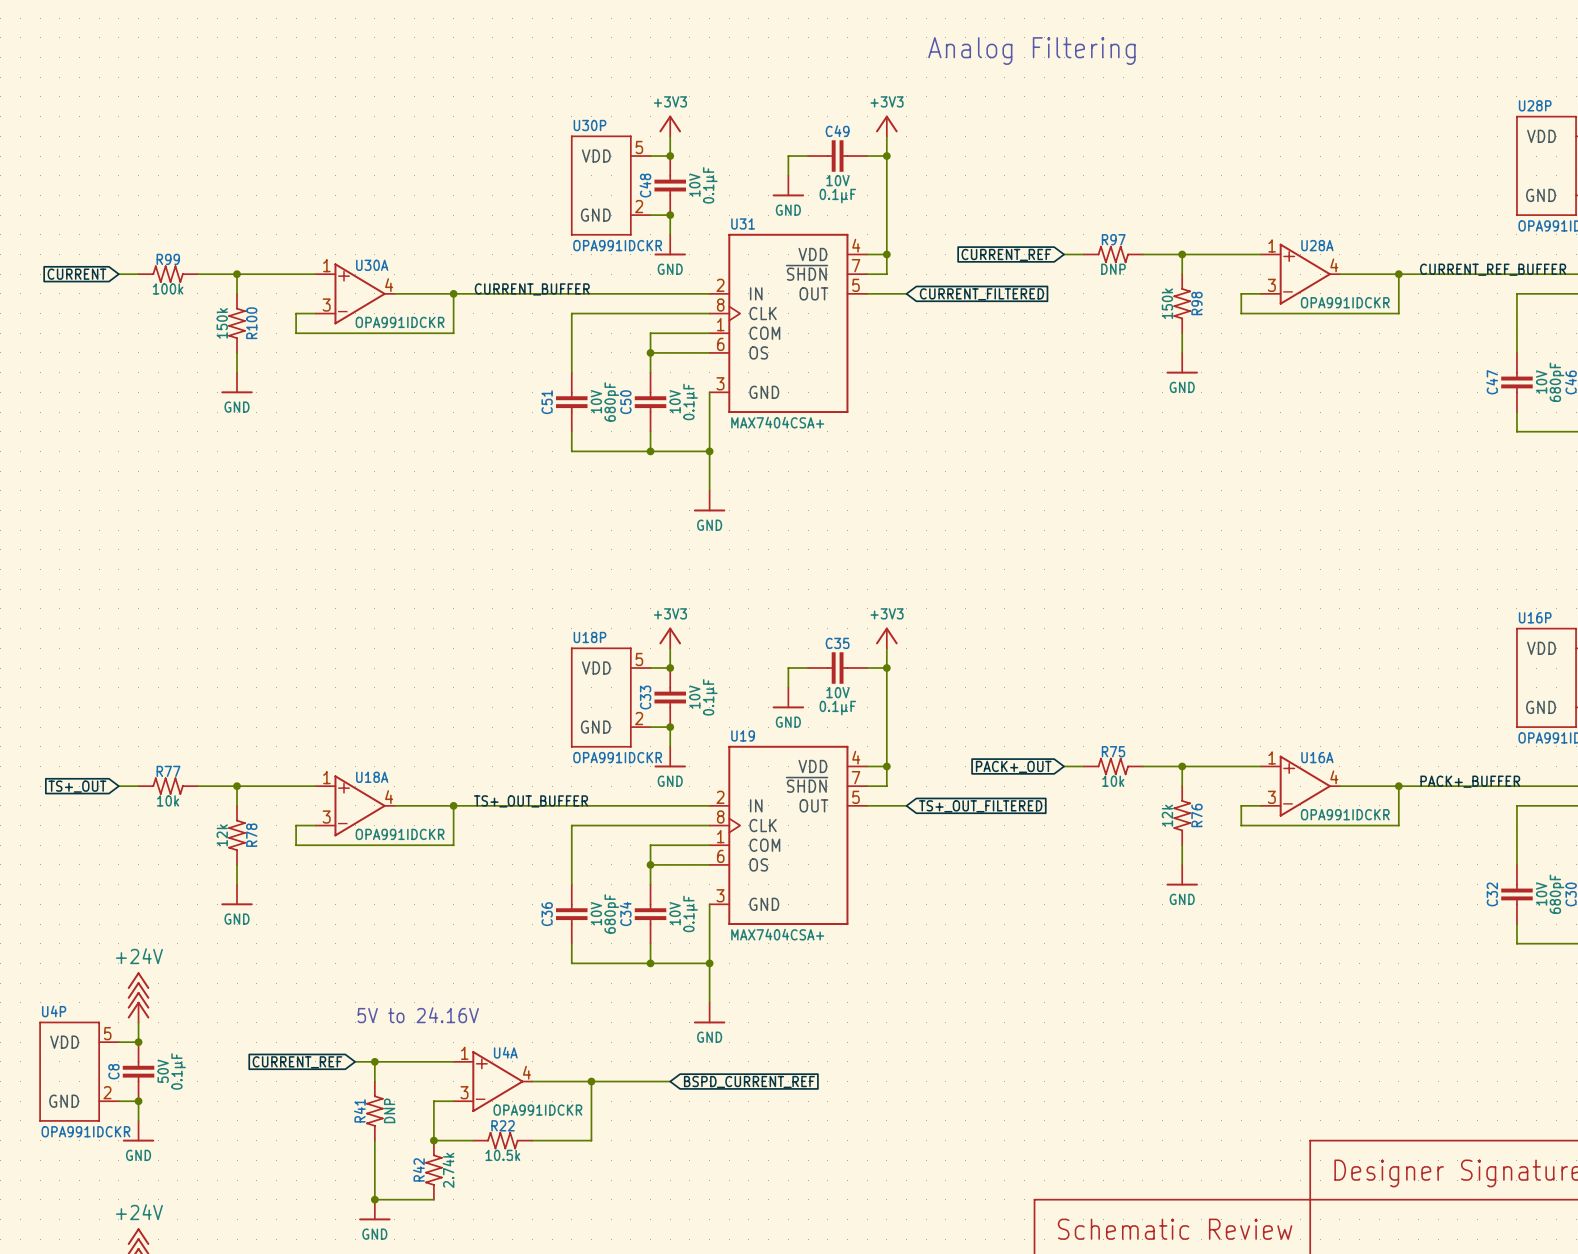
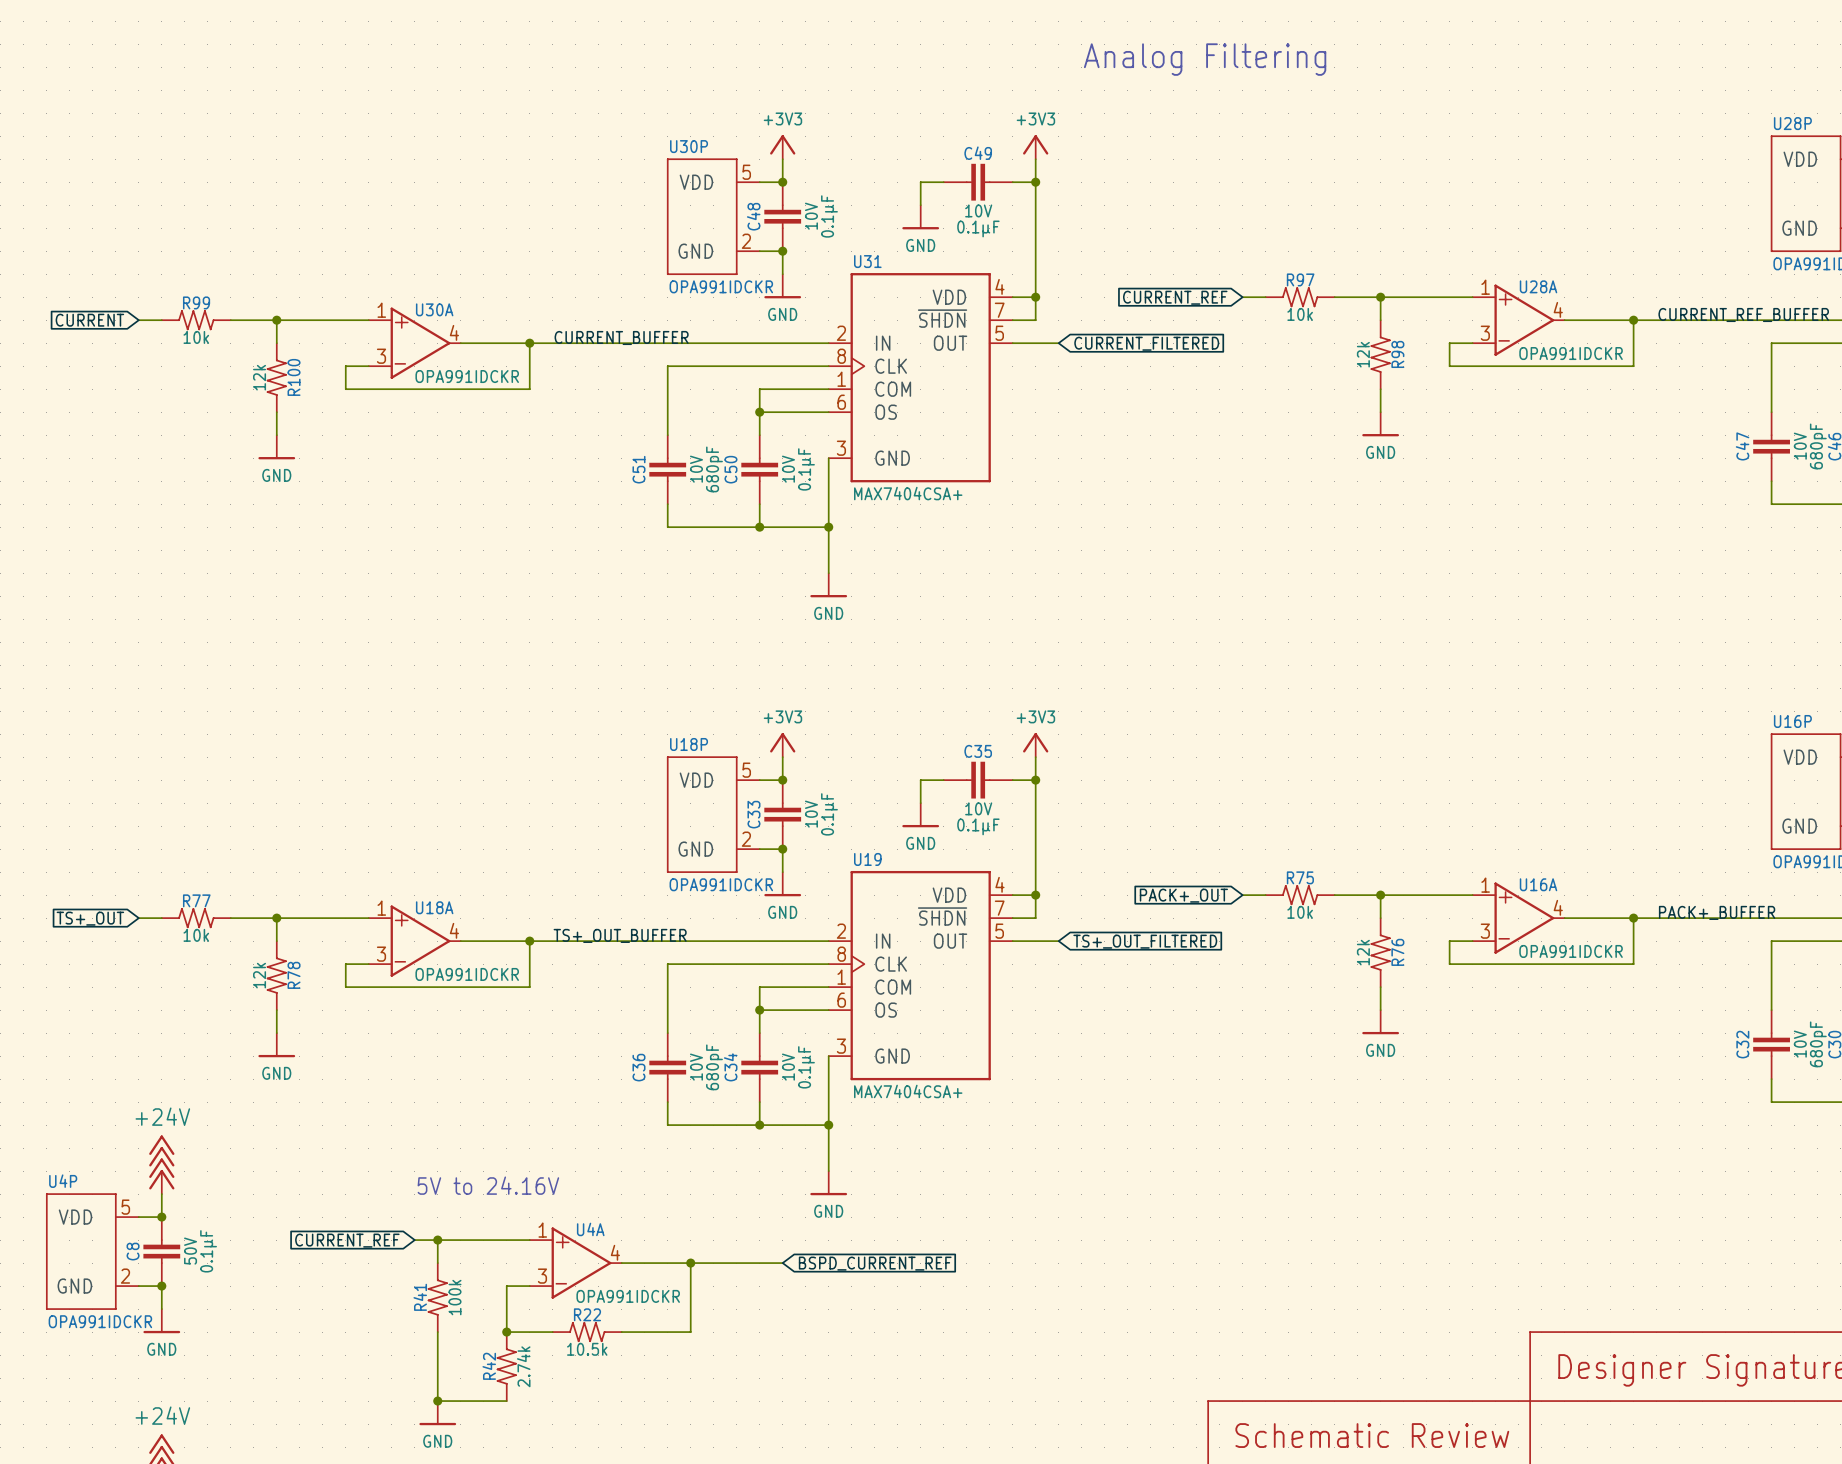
R97 text: DNP (1113, 269) -> 10k (1300, 314)
R99 text: 100k (168, 288) -> 10k (196, 337)
R98 text: 150k (1167, 303) -> 12k (1363, 354)
R100 text: 150k (222, 323) -> 12k (259, 377)
R41 text: DNP (389, 1110) -> 100k (455, 1297)

